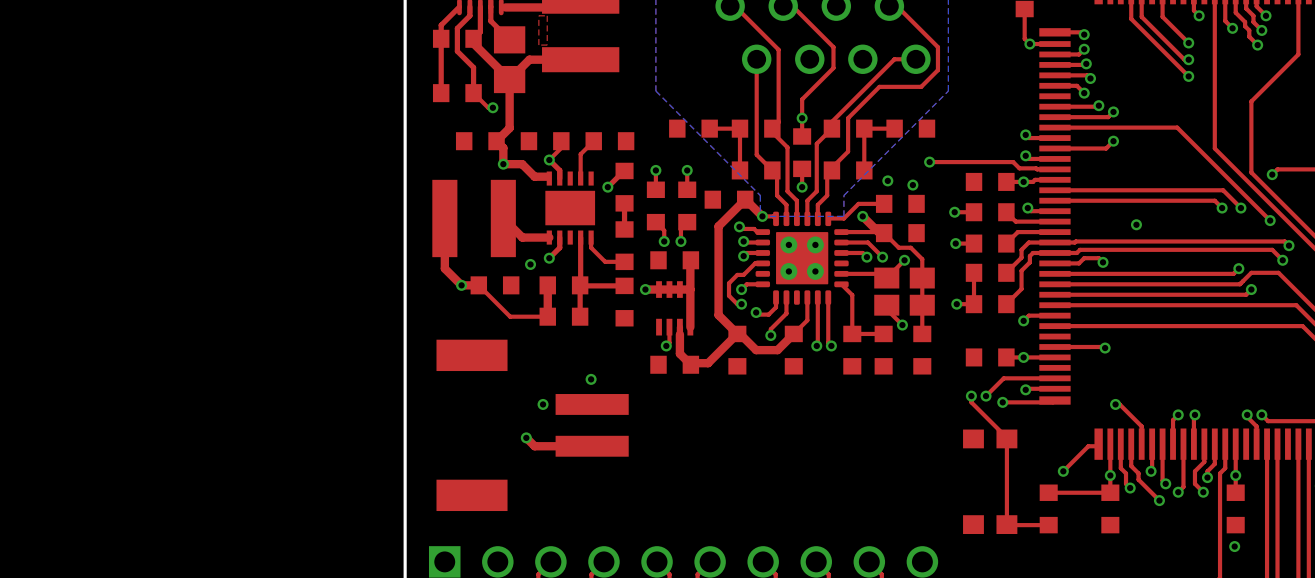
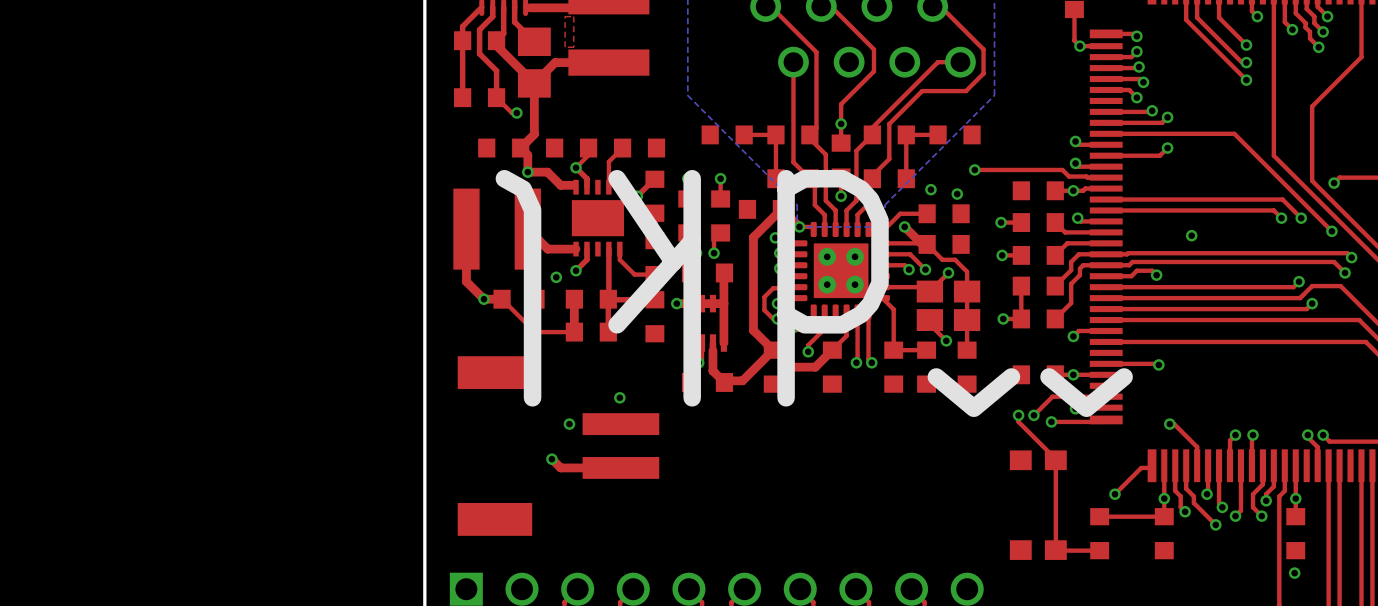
text: none -> ^^dkl (814, 293)

